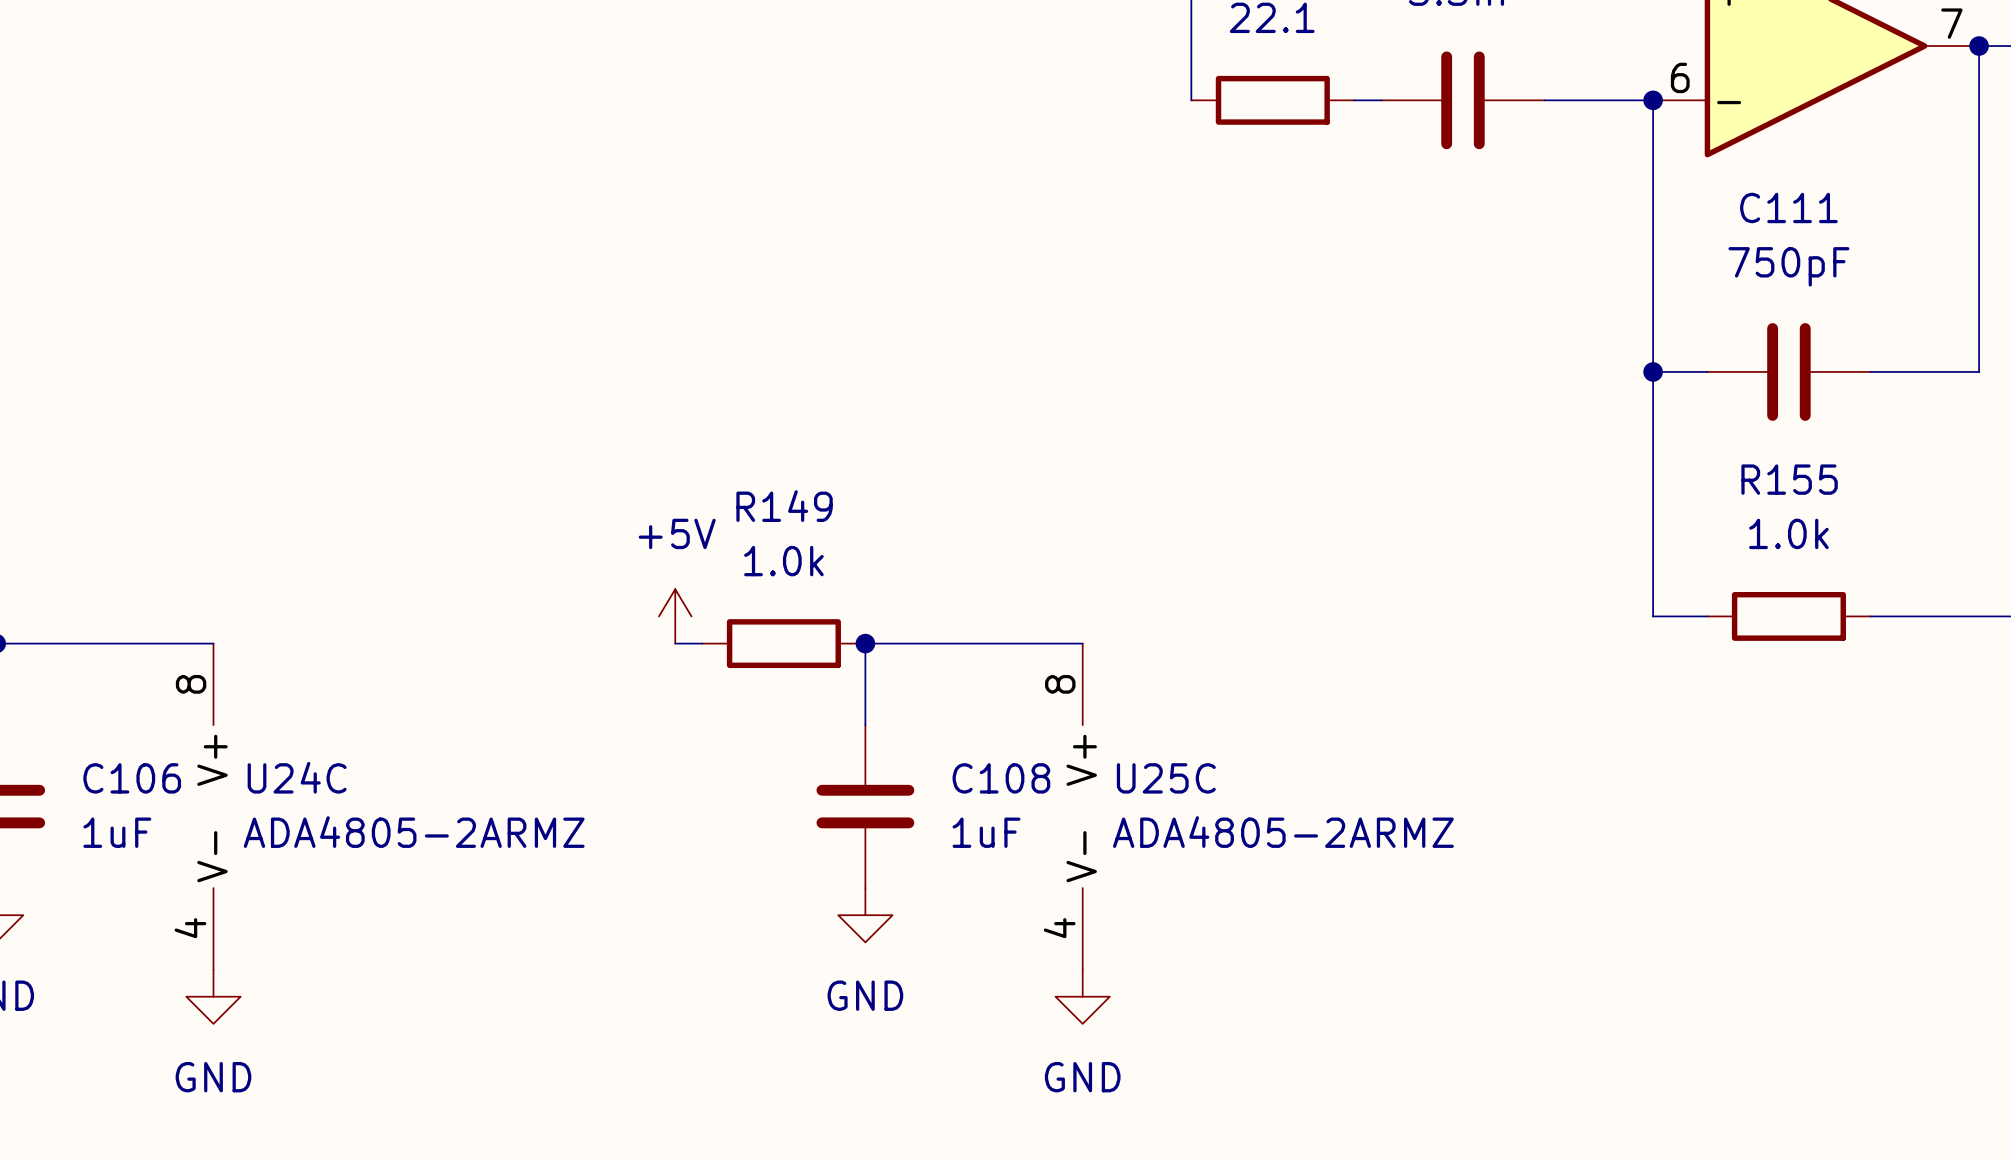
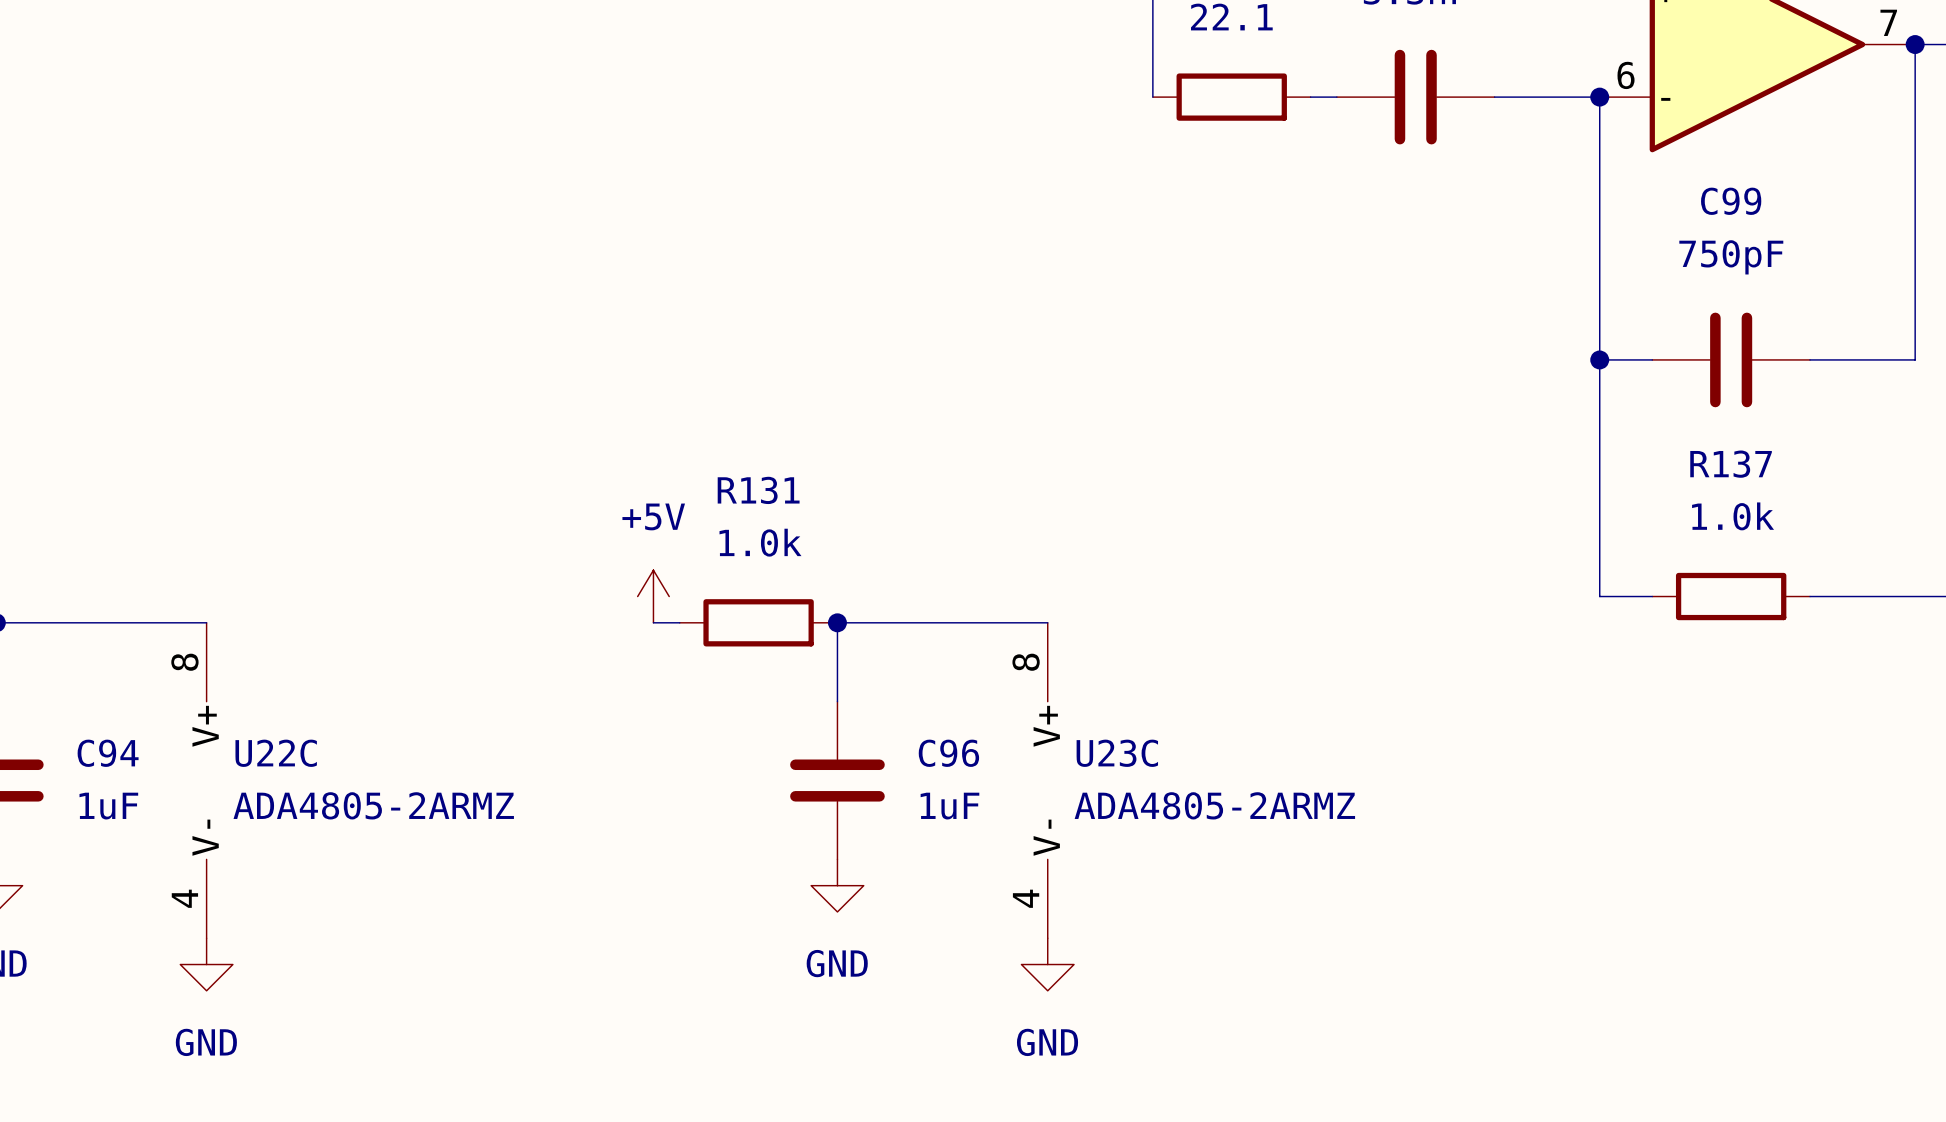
C111 name: C111 (1788, 207) -> C99 (1731, 201)
R155 name: R155 (1789, 479) -> R137 (1731, 464)
R149 name: R149 (784, 506) -> R131 (758, 490)
U24C name: U24C (297, 777) -> U22C (276, 753)
C106 name: C106 (132, 778) -> C94 (108, 753)
C108 name: C108 (1001, 778) -> C96 (948, 753)
U25C name: U25C (1166, 778) -> U23C (1117, 753)

